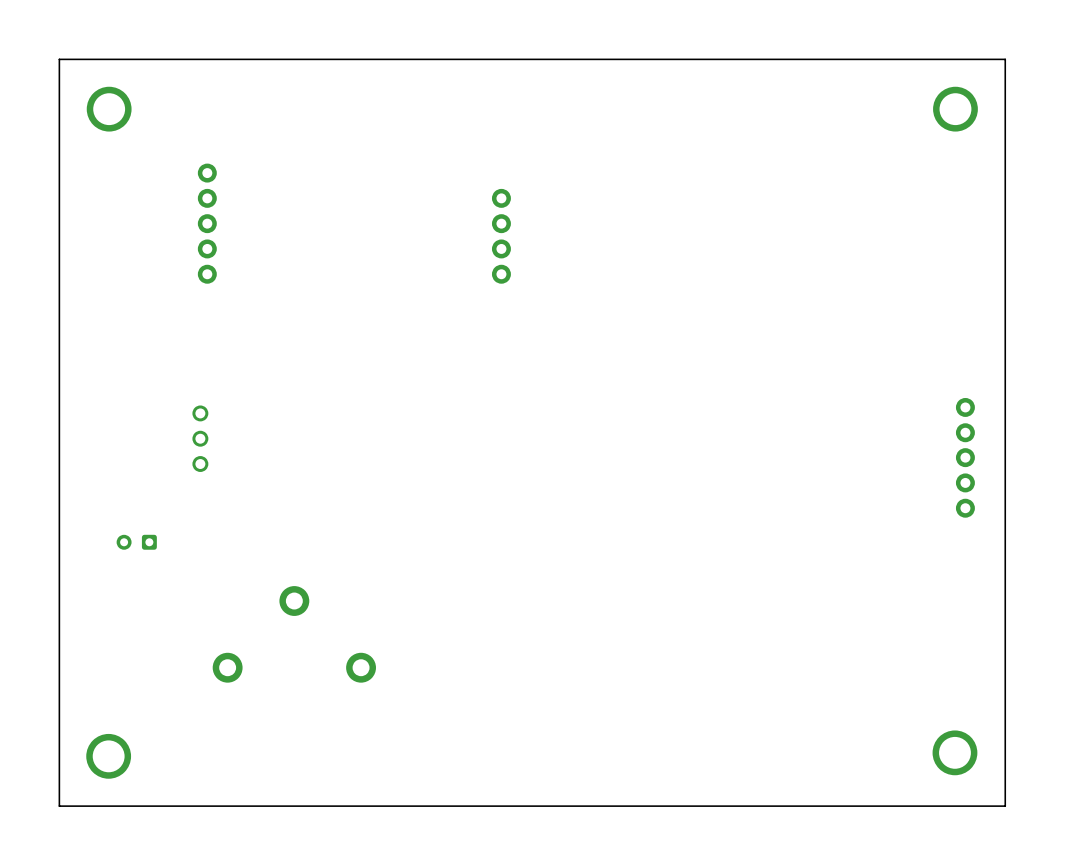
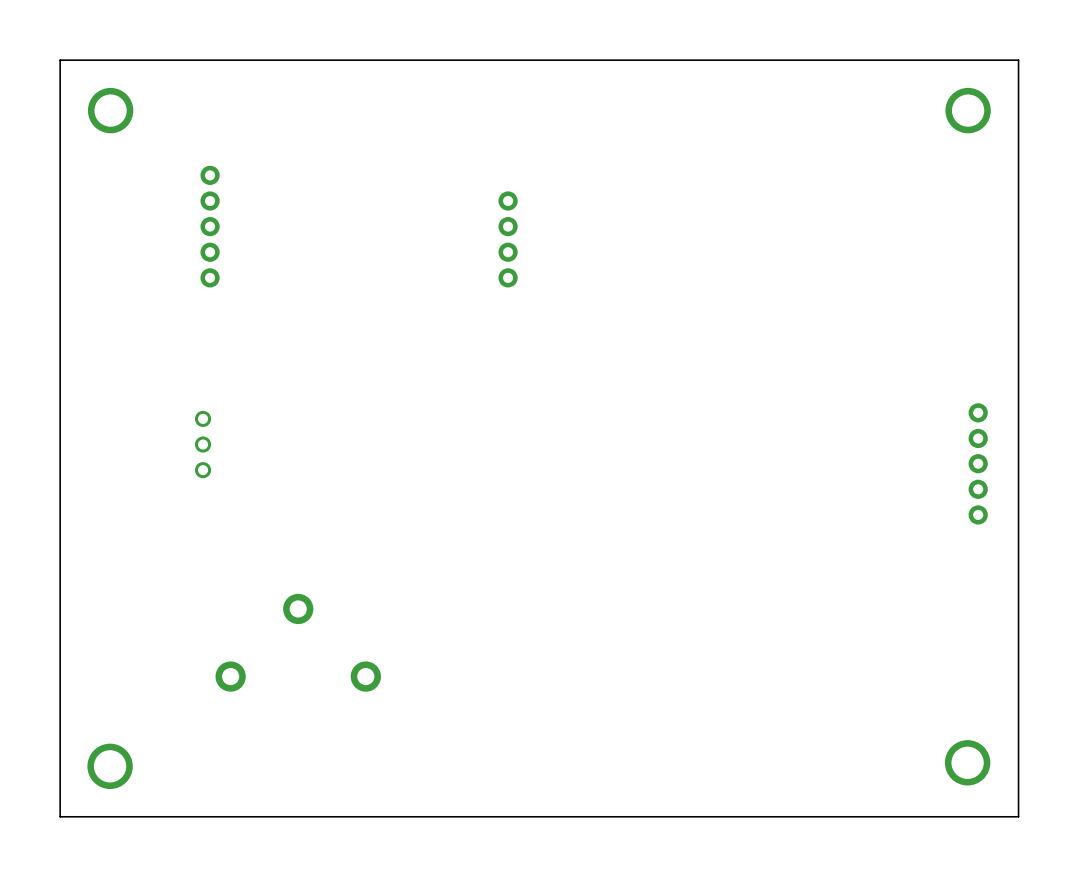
part: (136, 542) -> none

